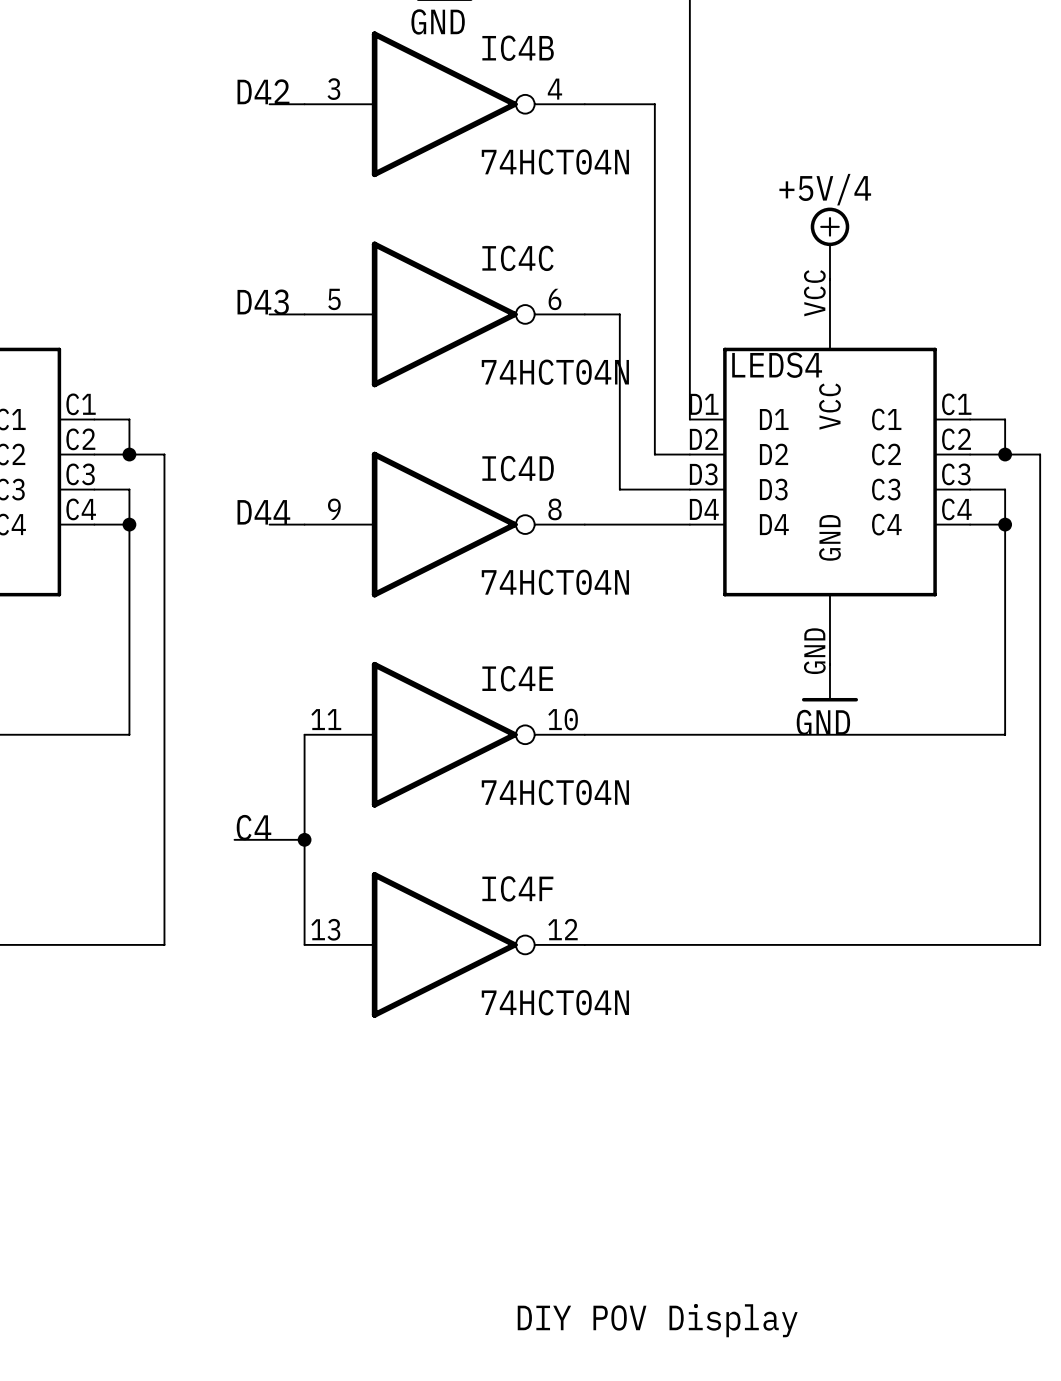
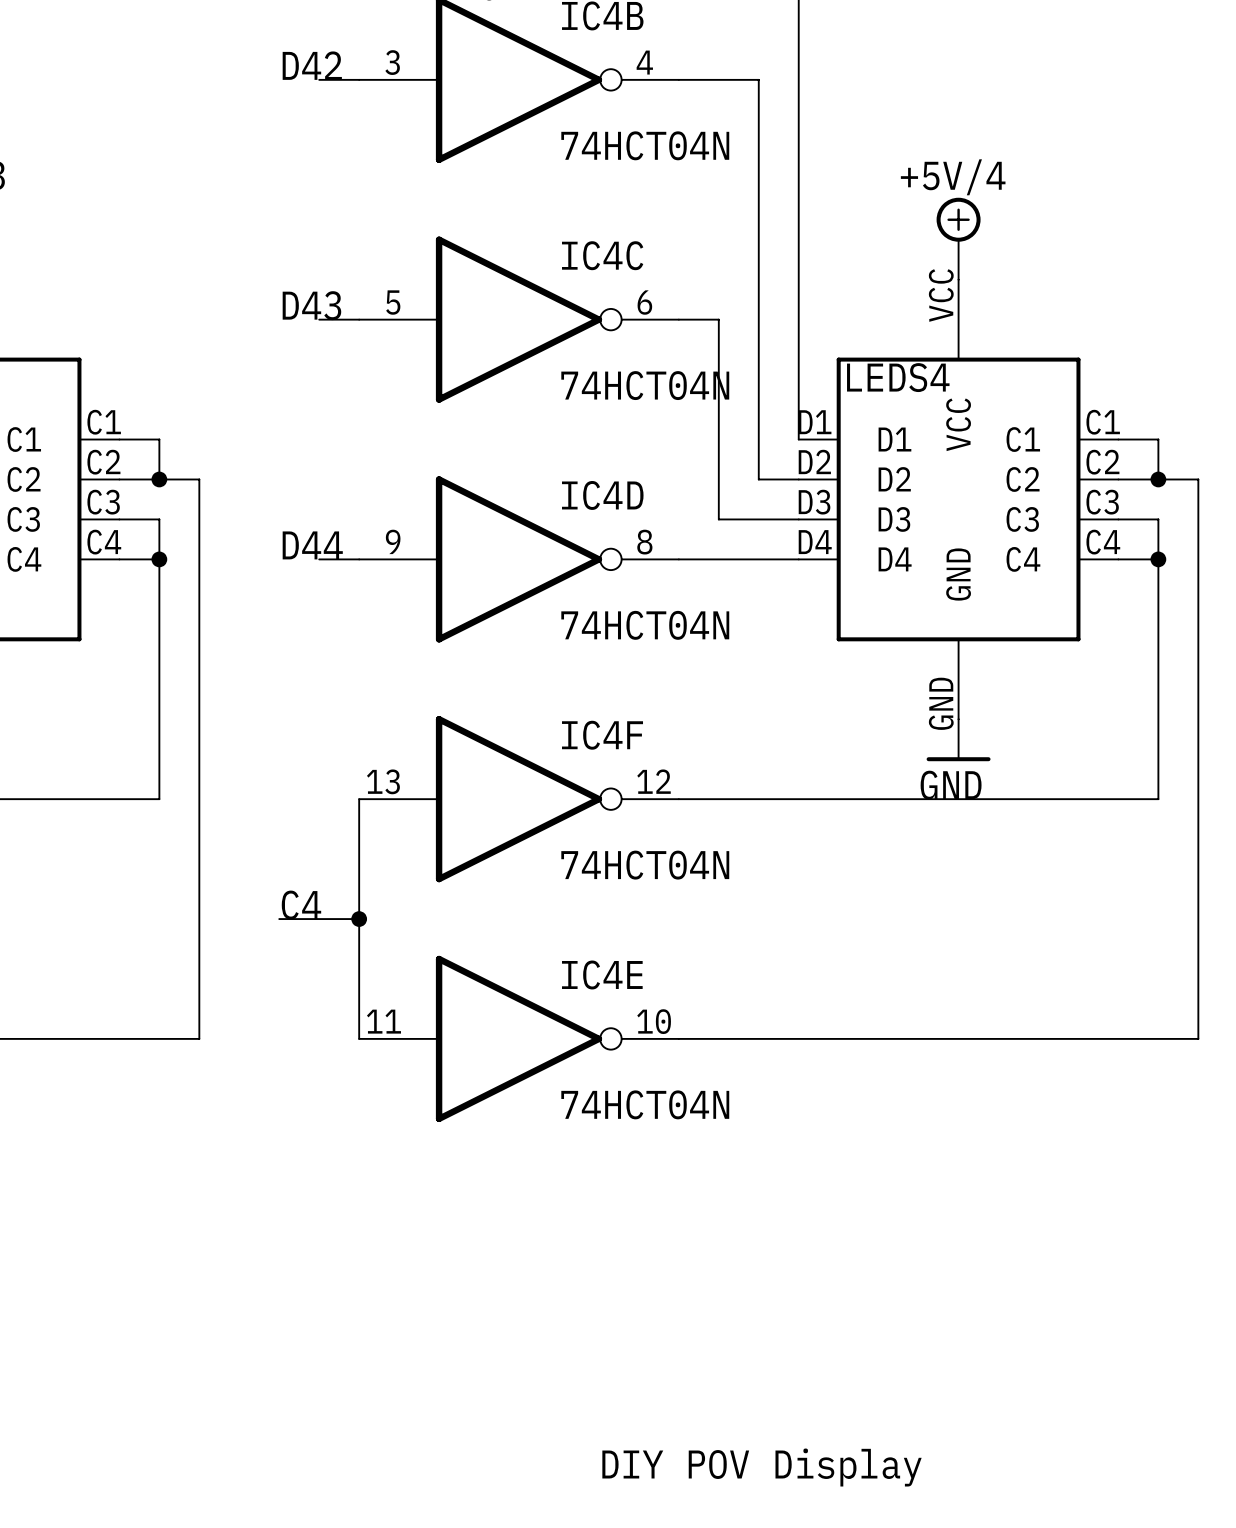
IC4E position: (444, 734) -> (519, 1038)
IC4F position: (444, 944) -> (519, 799)

